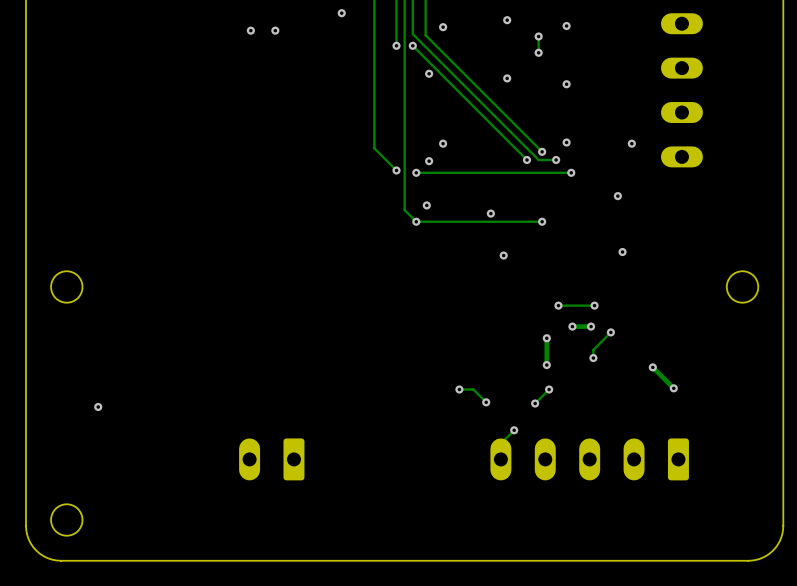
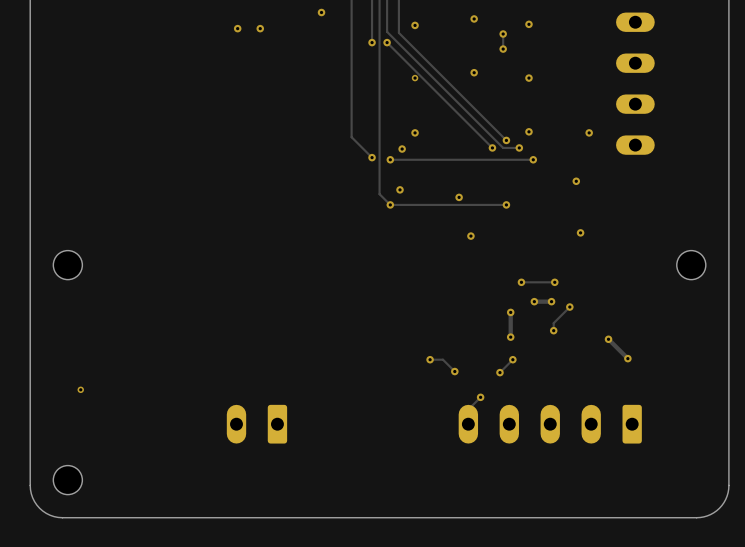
via: (429, 73) -> none
via: none -> (415, 78)
via: (98, 406) -> none
via: none -> (80, 389)

